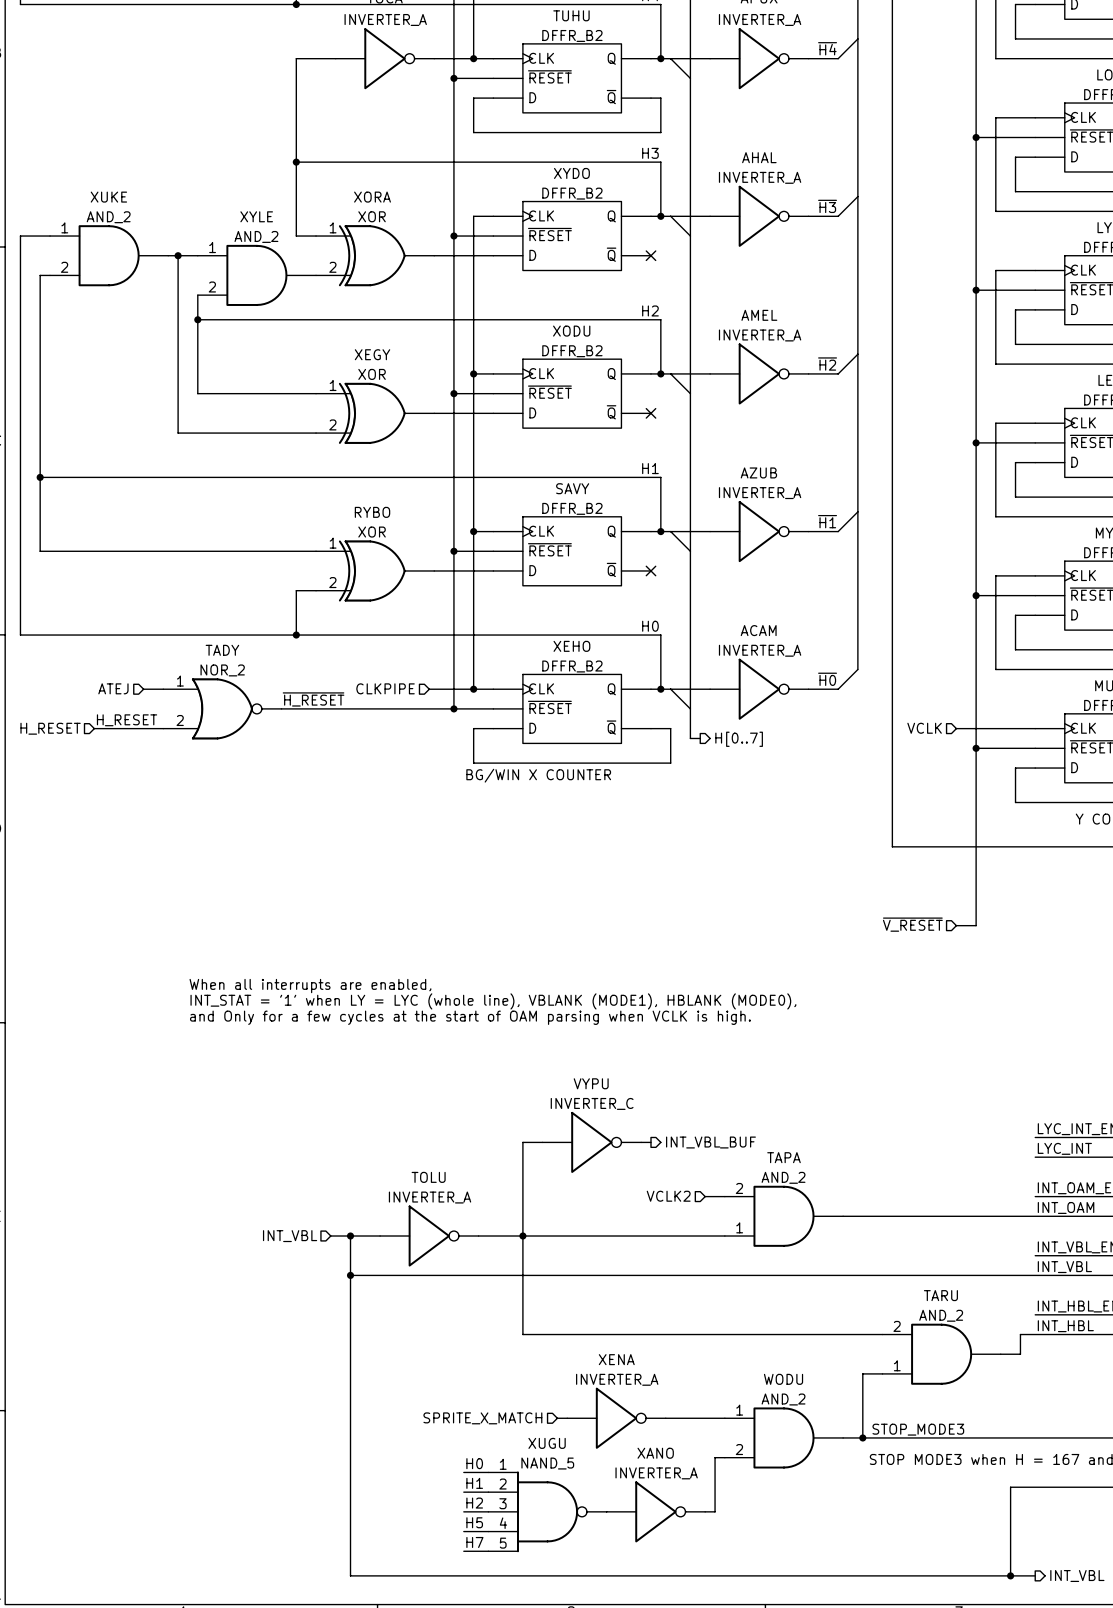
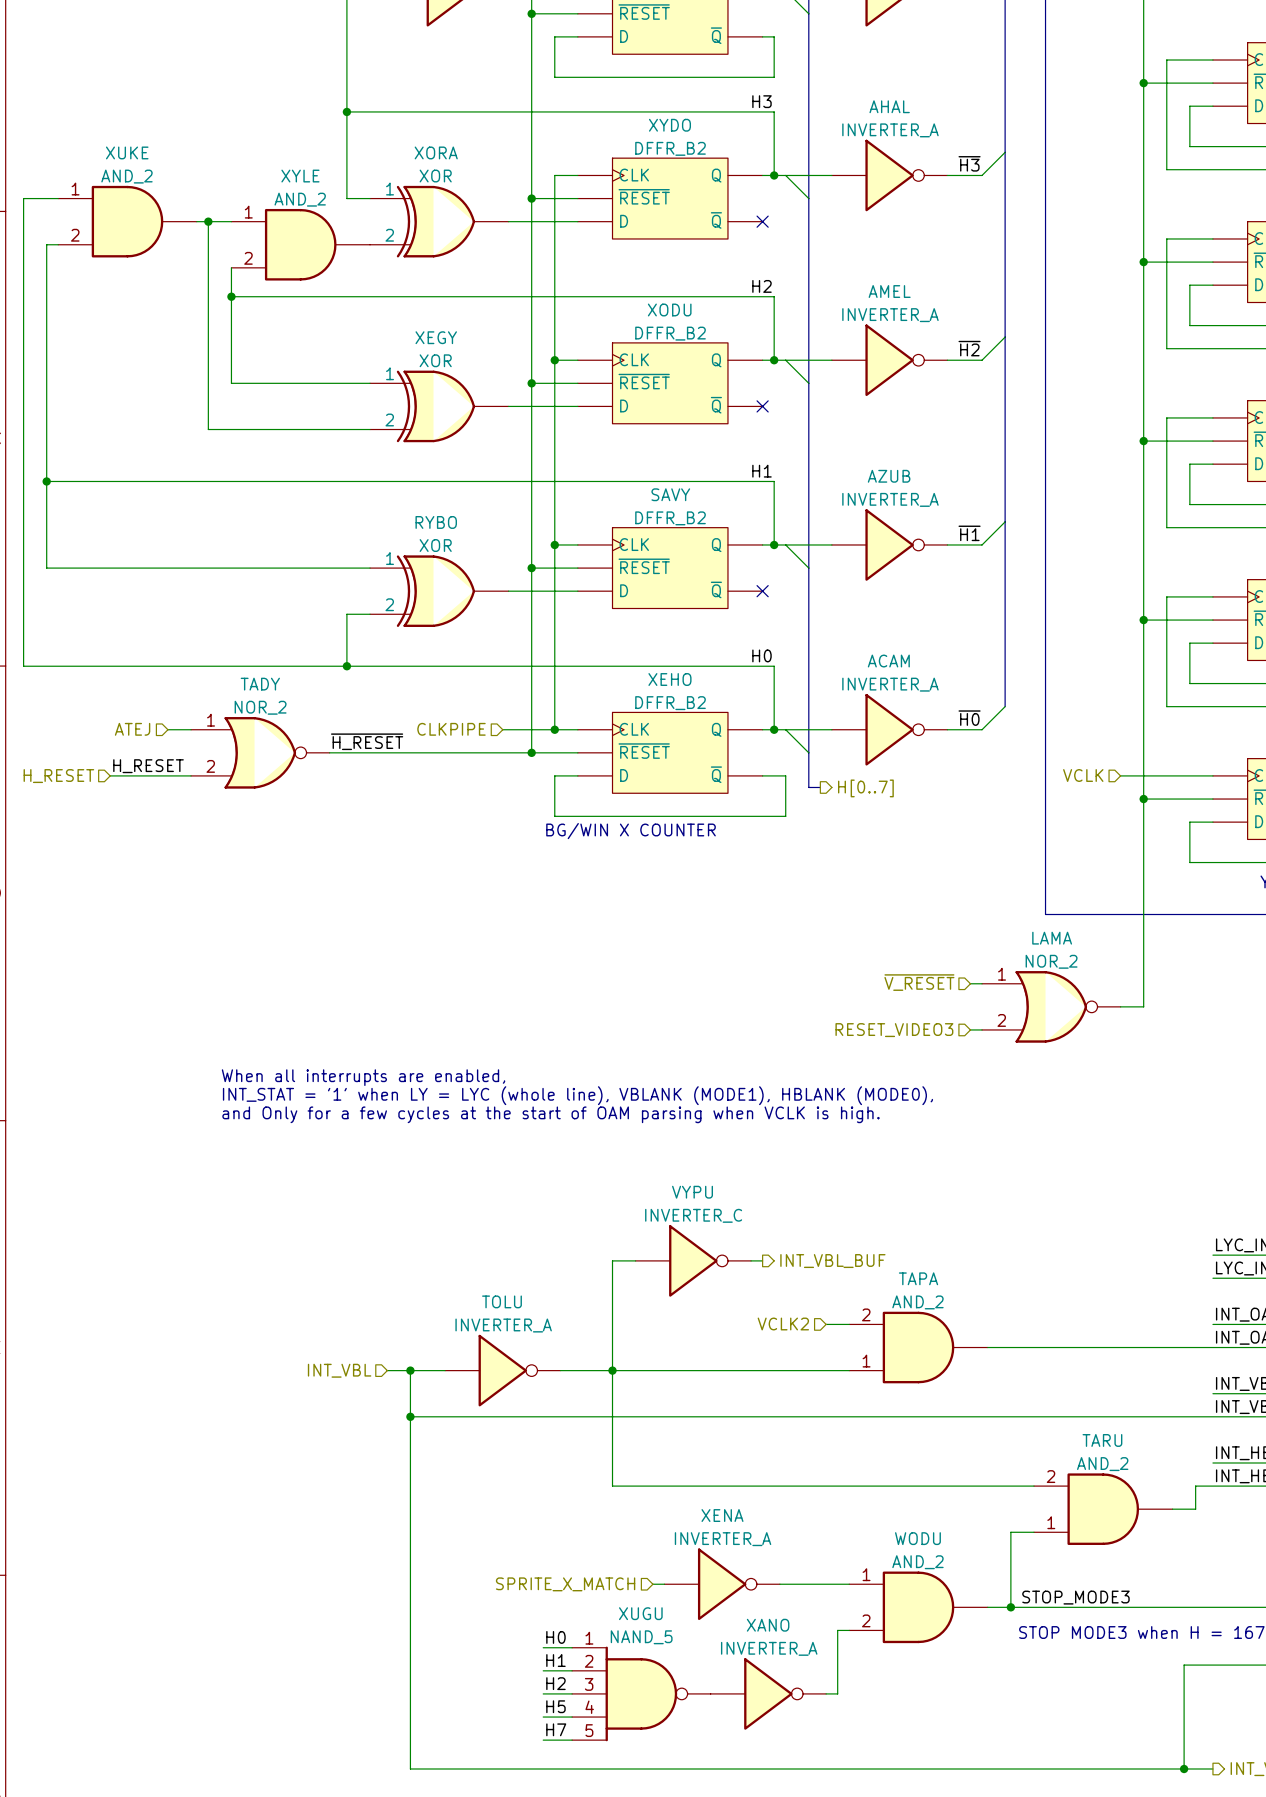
wire: none -> (970, 983) (982, 983)
hierarchical label position: ~{V_RESET} (912, 924) -> ~{V_RESET} (919, 982)
LAMA: none -> NOR_2 (1051, 1006)
hierarchical label: none -> RESET_VIDEO3 (894, 1030)
wire: none -> (970, 1029) (982, 1029)

